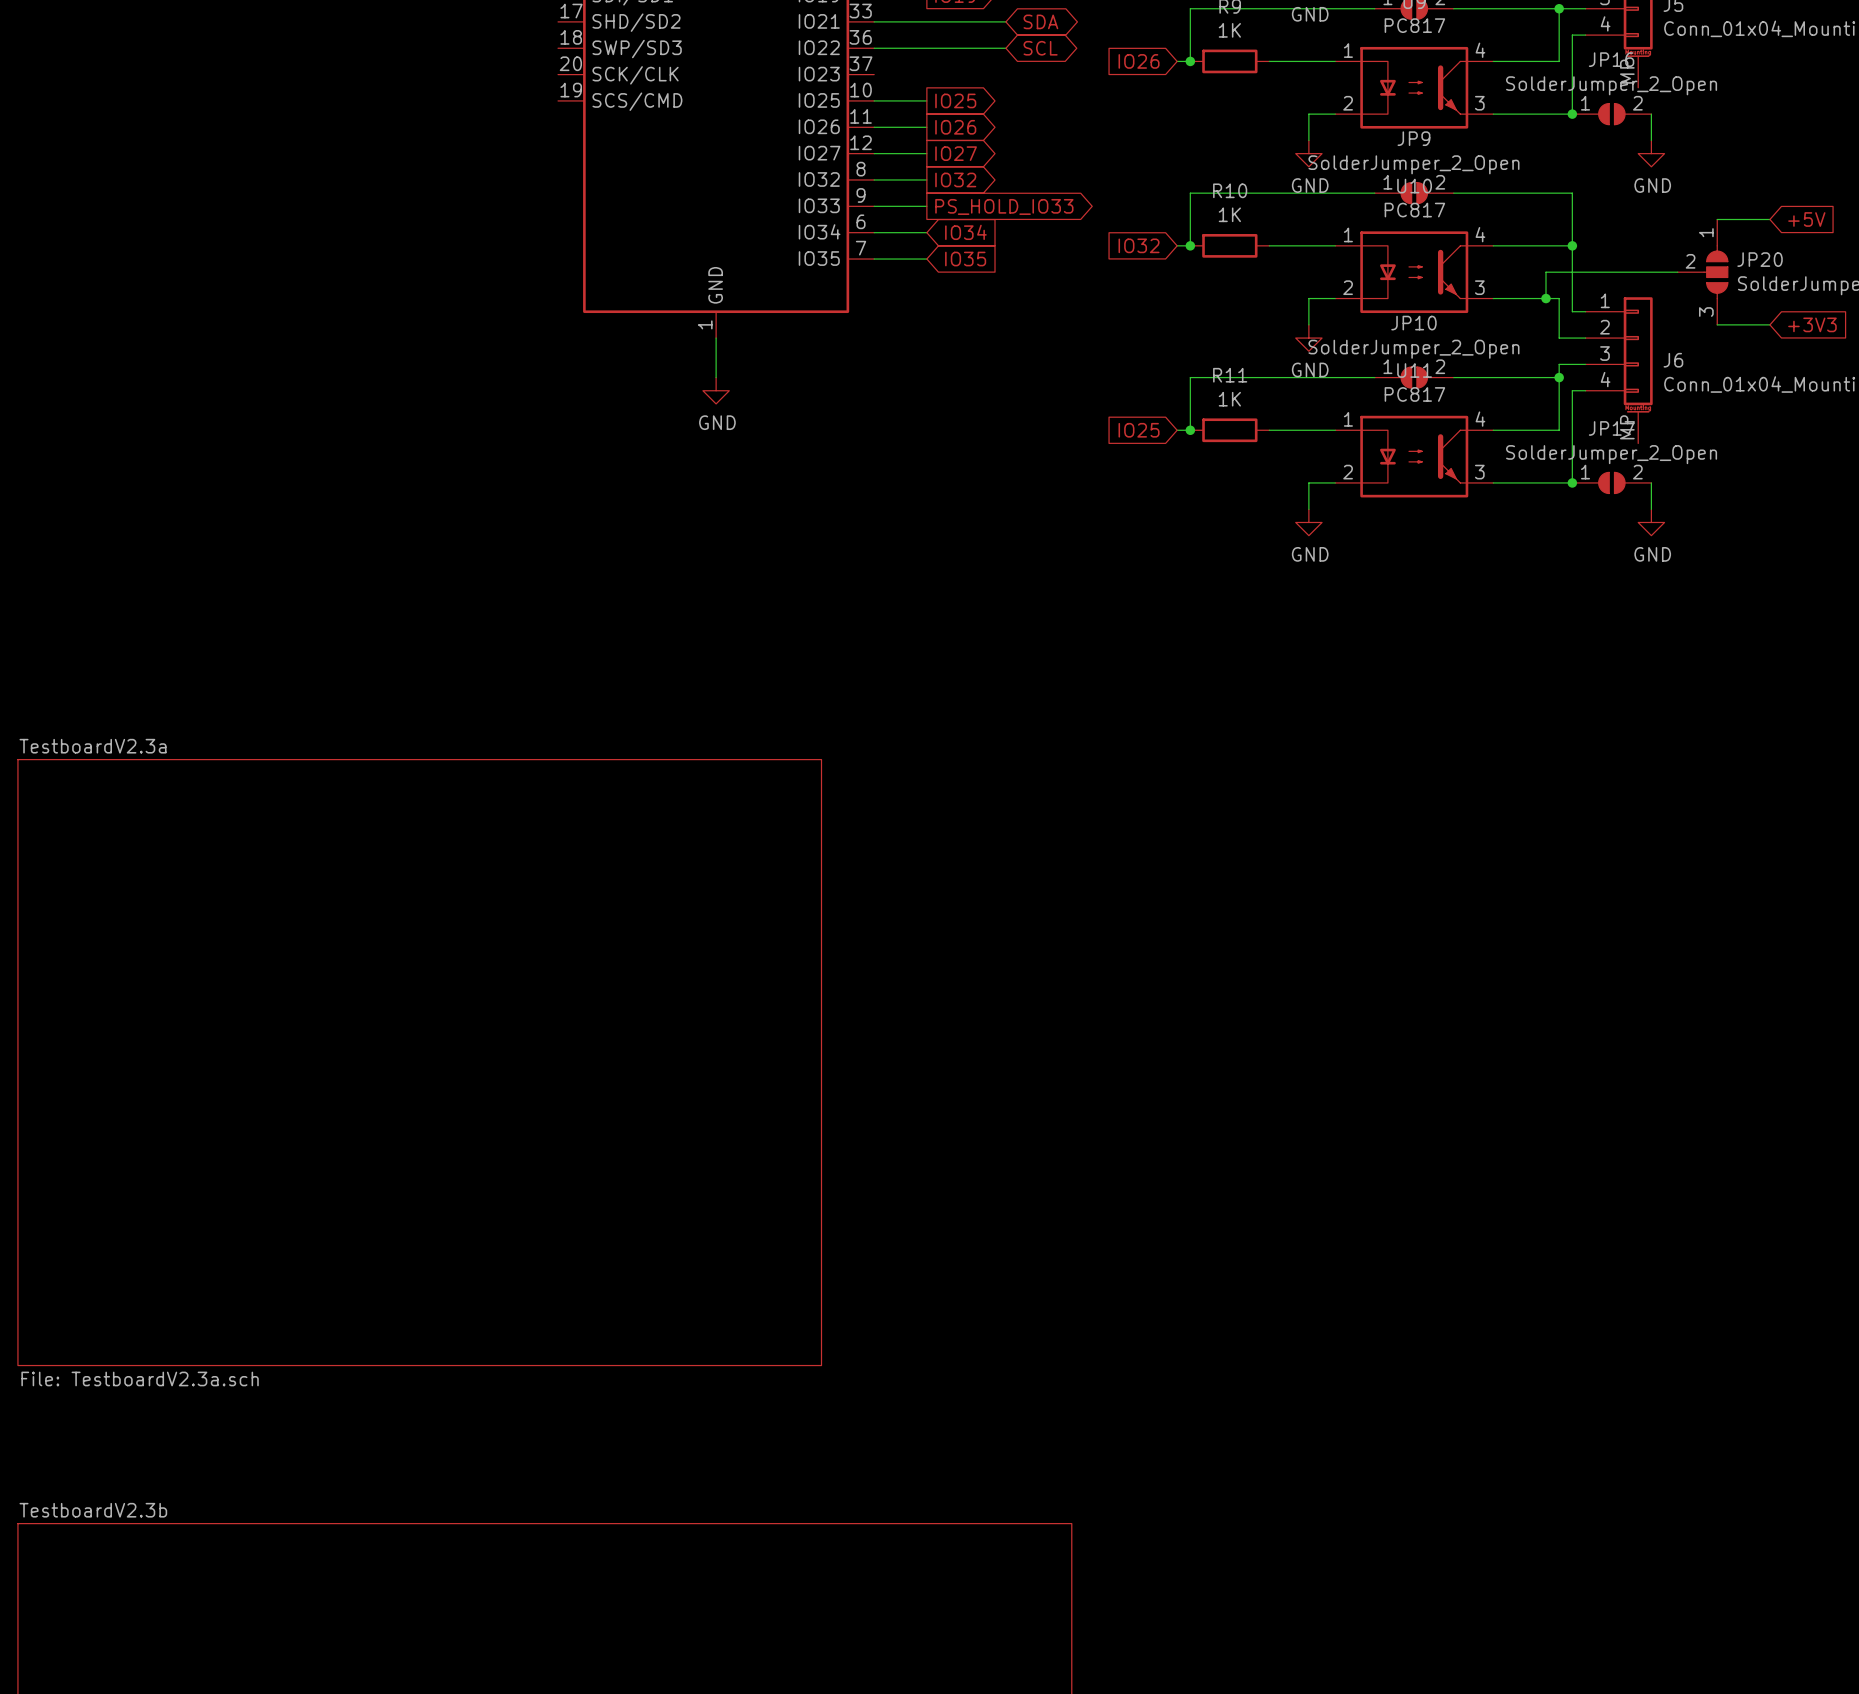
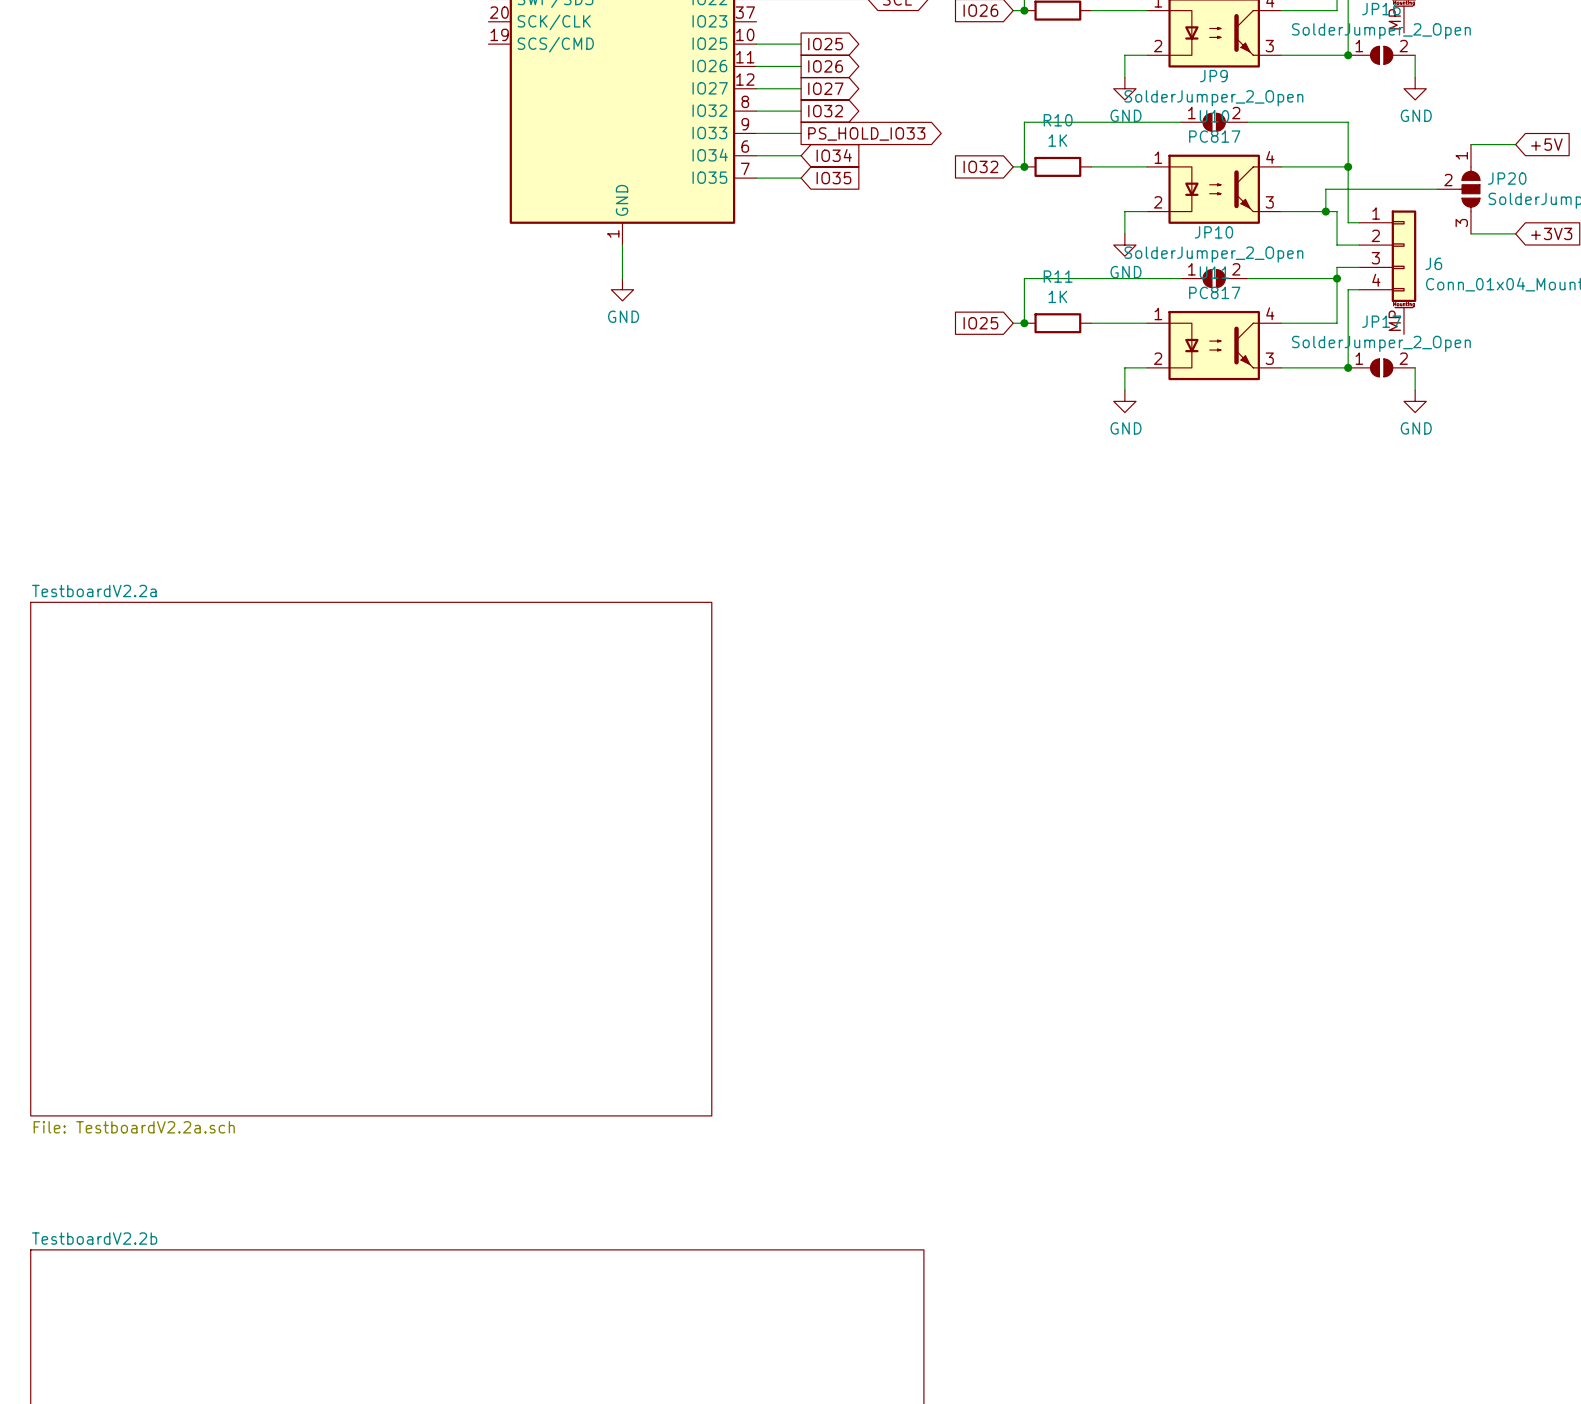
sheet TestboardV2.3a name: TestboardV2.3a (93, 746) -> TestboardV2.2a (94, 591)
sheet TestboardV2.3a value: File: TestboardV2.3a.sch (140, 1378) -> File: TestboardV2.2a.sch (134, 1127)
sheet TestboardV2.3b name: TestboardV2.3b (93, 1510) -> TestboardV2.2b (94, 1238)

